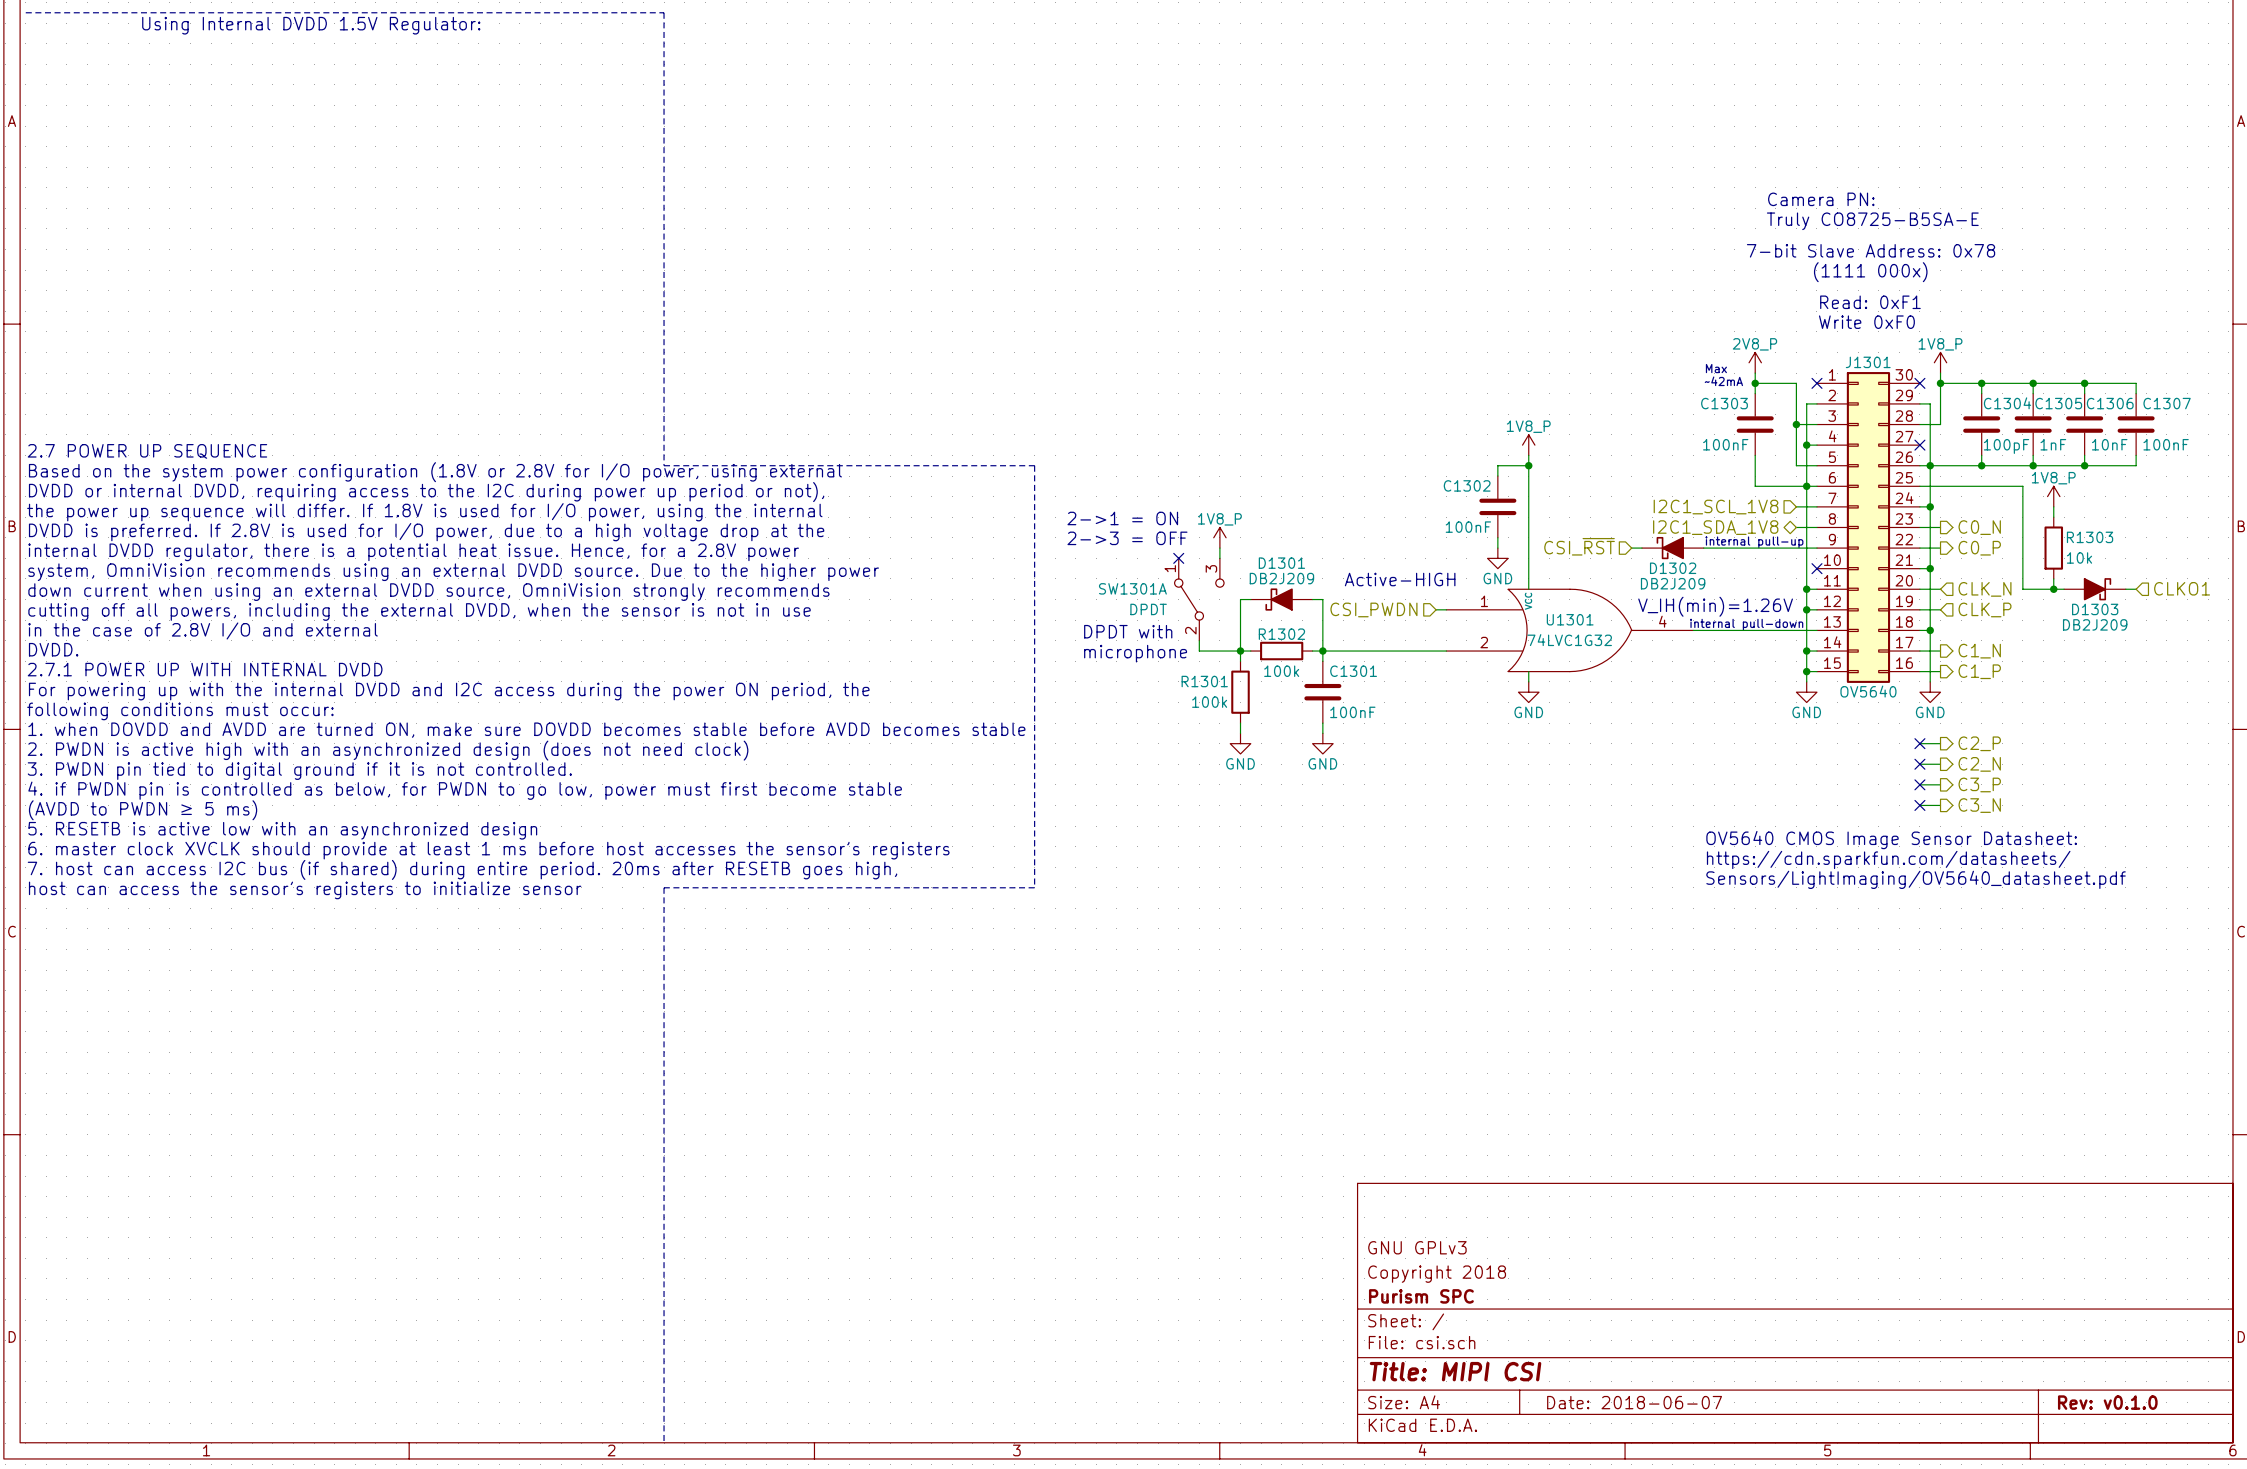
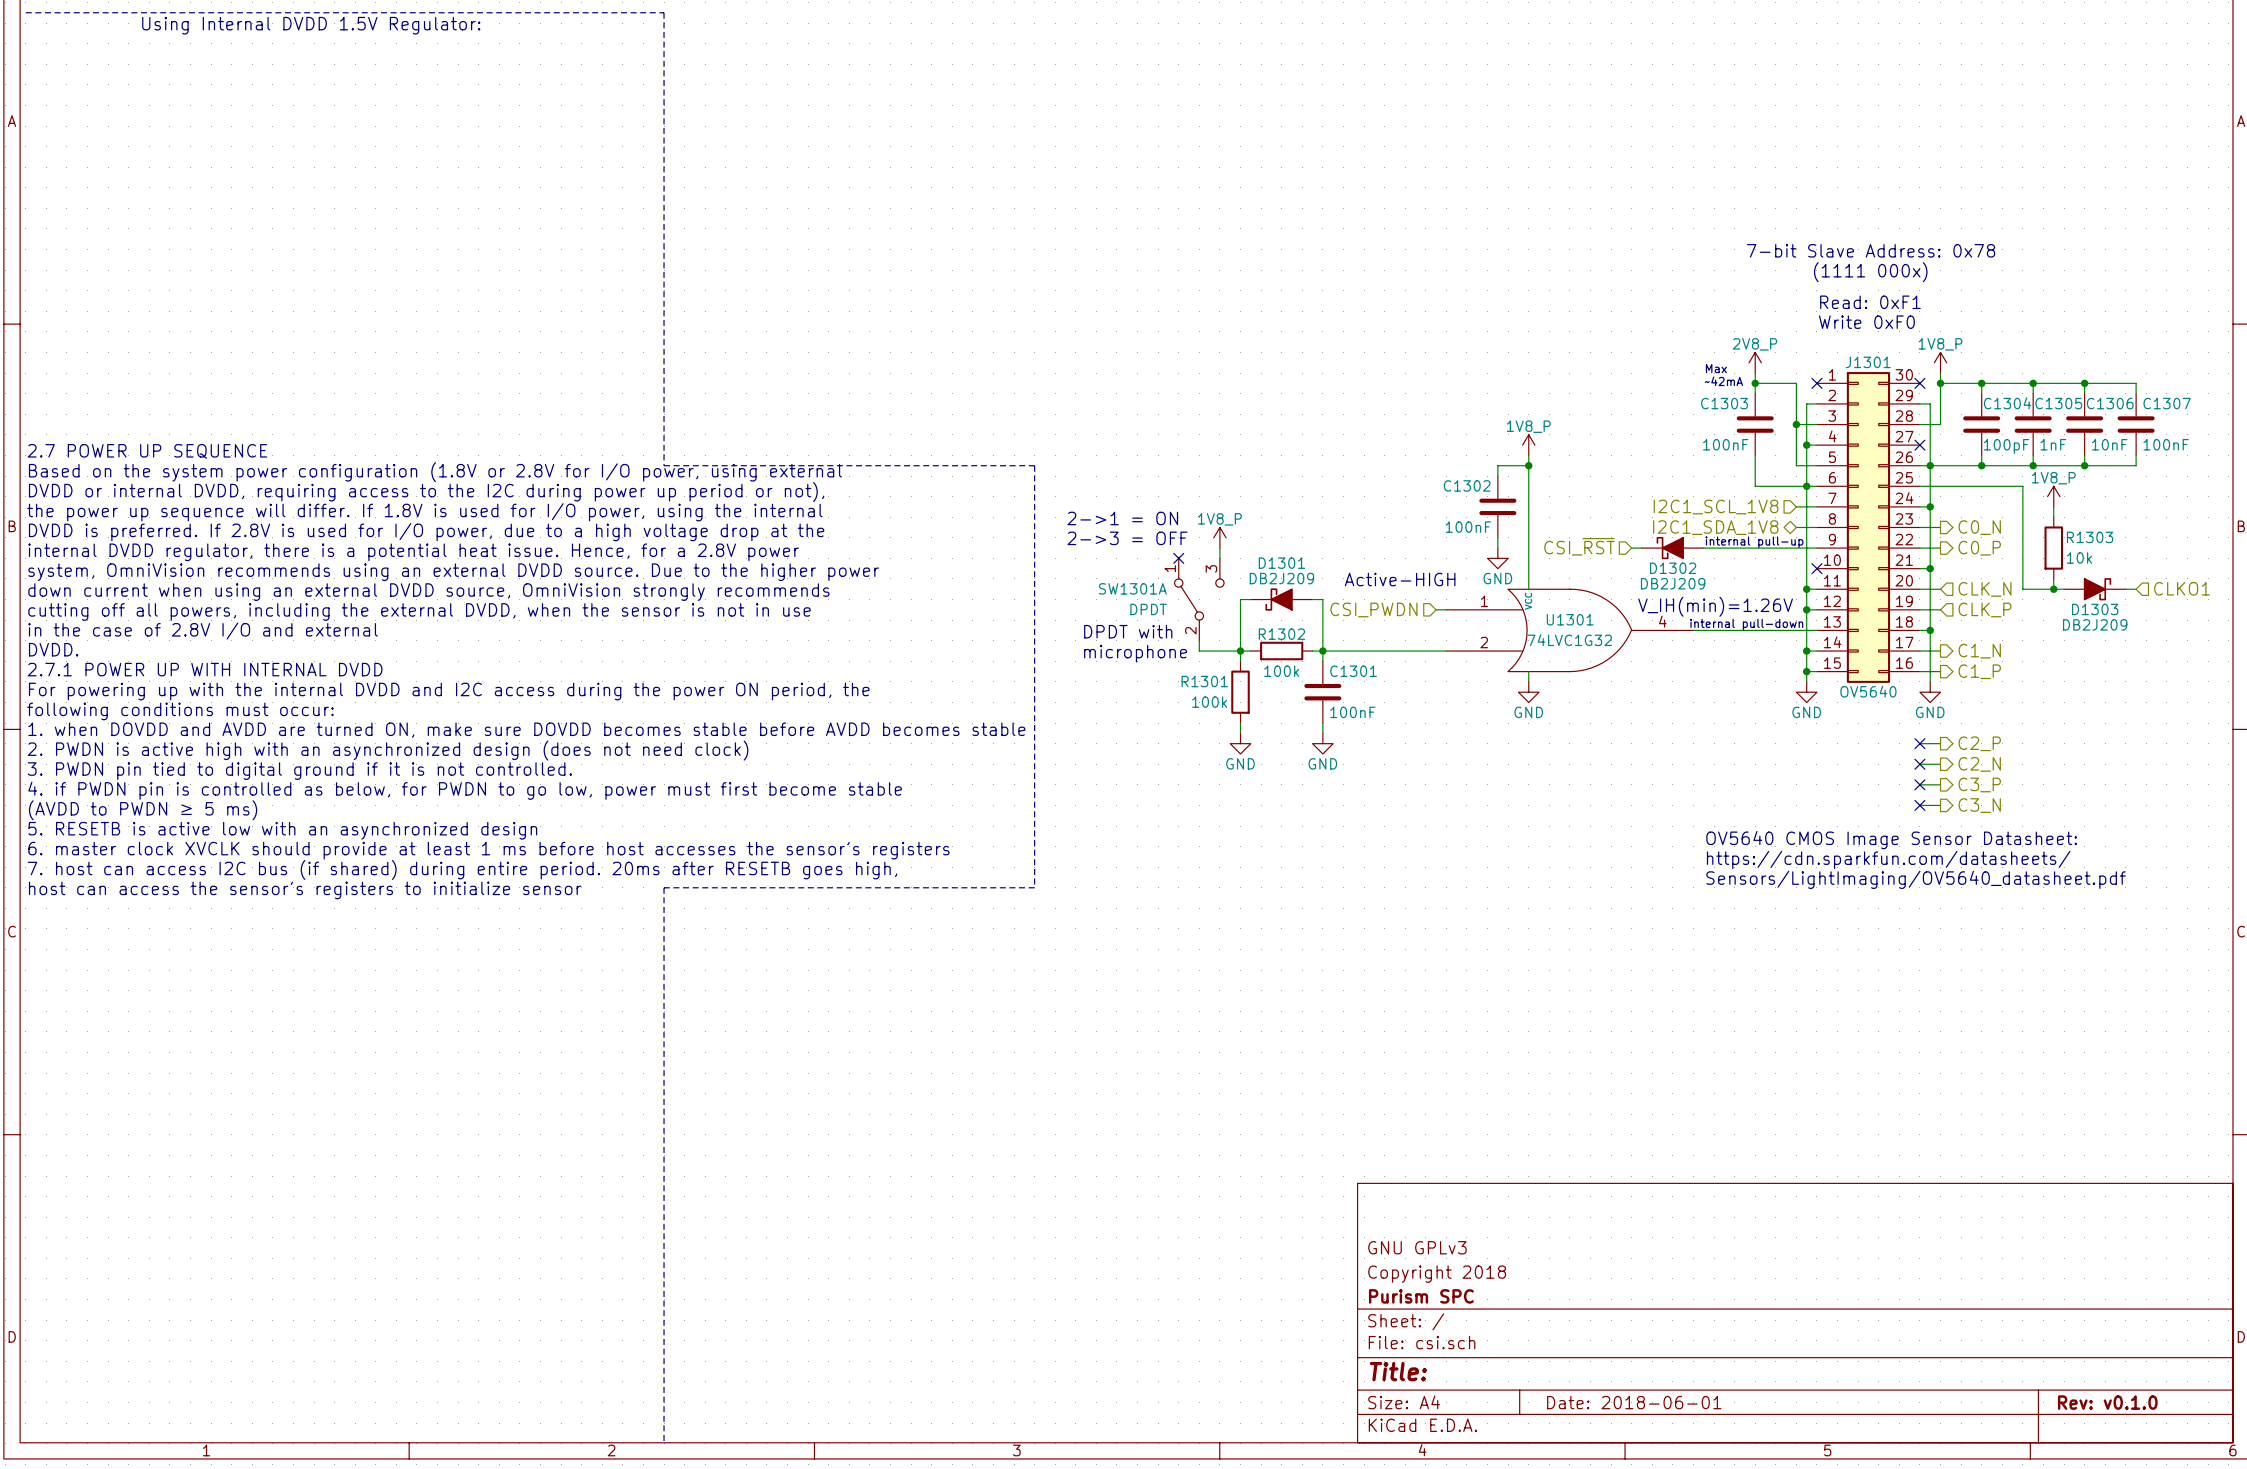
text: Camera PN: (1821, 199) -> none
text: Truly CO8725-B5SA-E (1872, 221) -> none
title block: Title: MIPI CSI (1455, 1371) -> Title: (1398, 1371)
title block: Date: 2018-06-07 (1634, 1402) -> Date: 2018-06-01 (1634, 1402)

